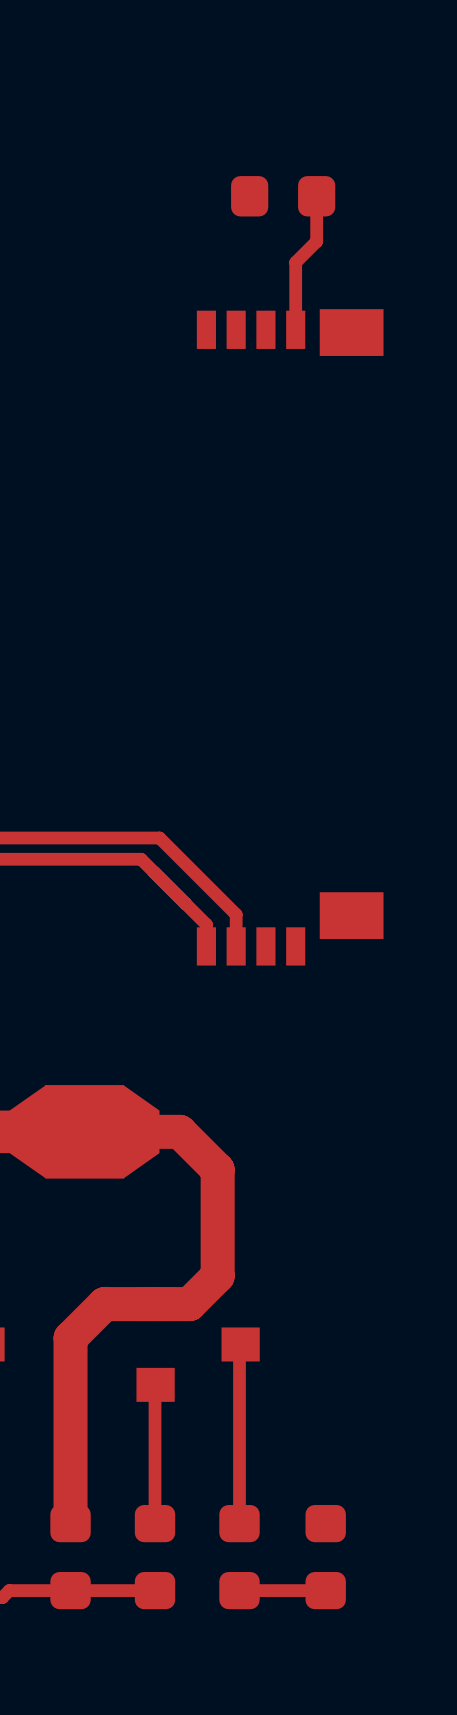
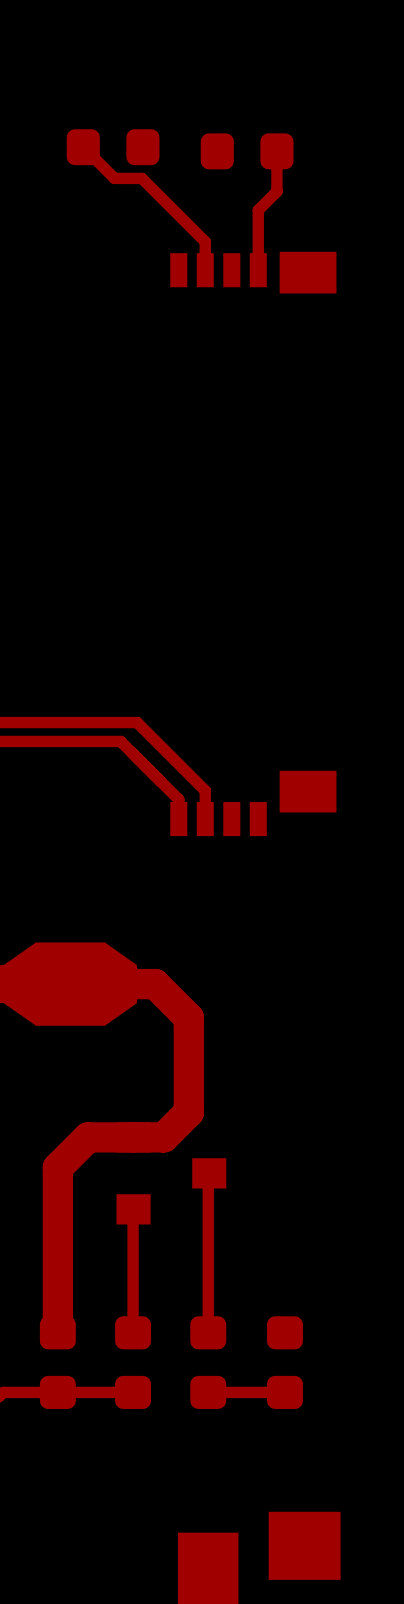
top track: none -> (83, 147) (114, 178) (141, 178) (205, 241) (205, 270)
part: none -> (113, 147)

